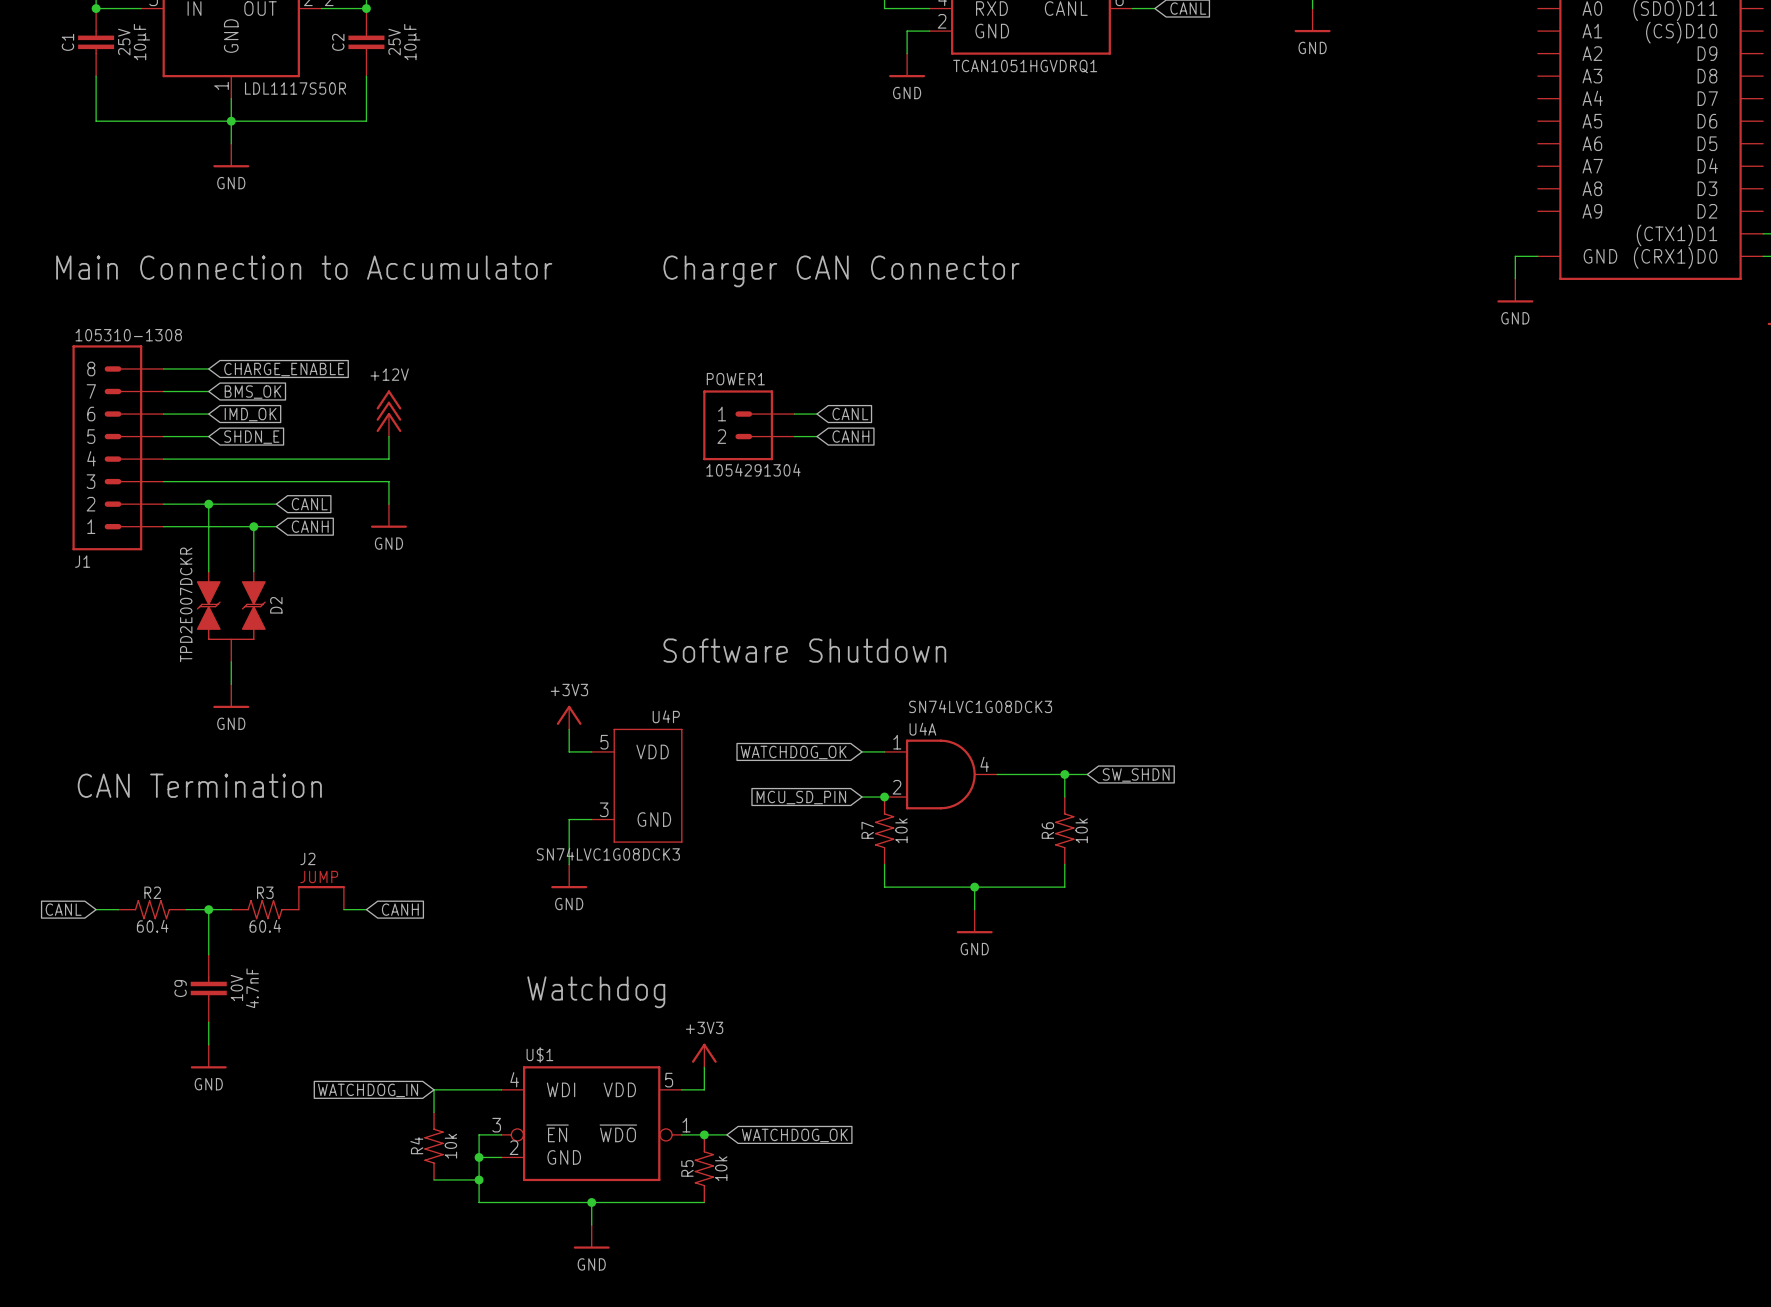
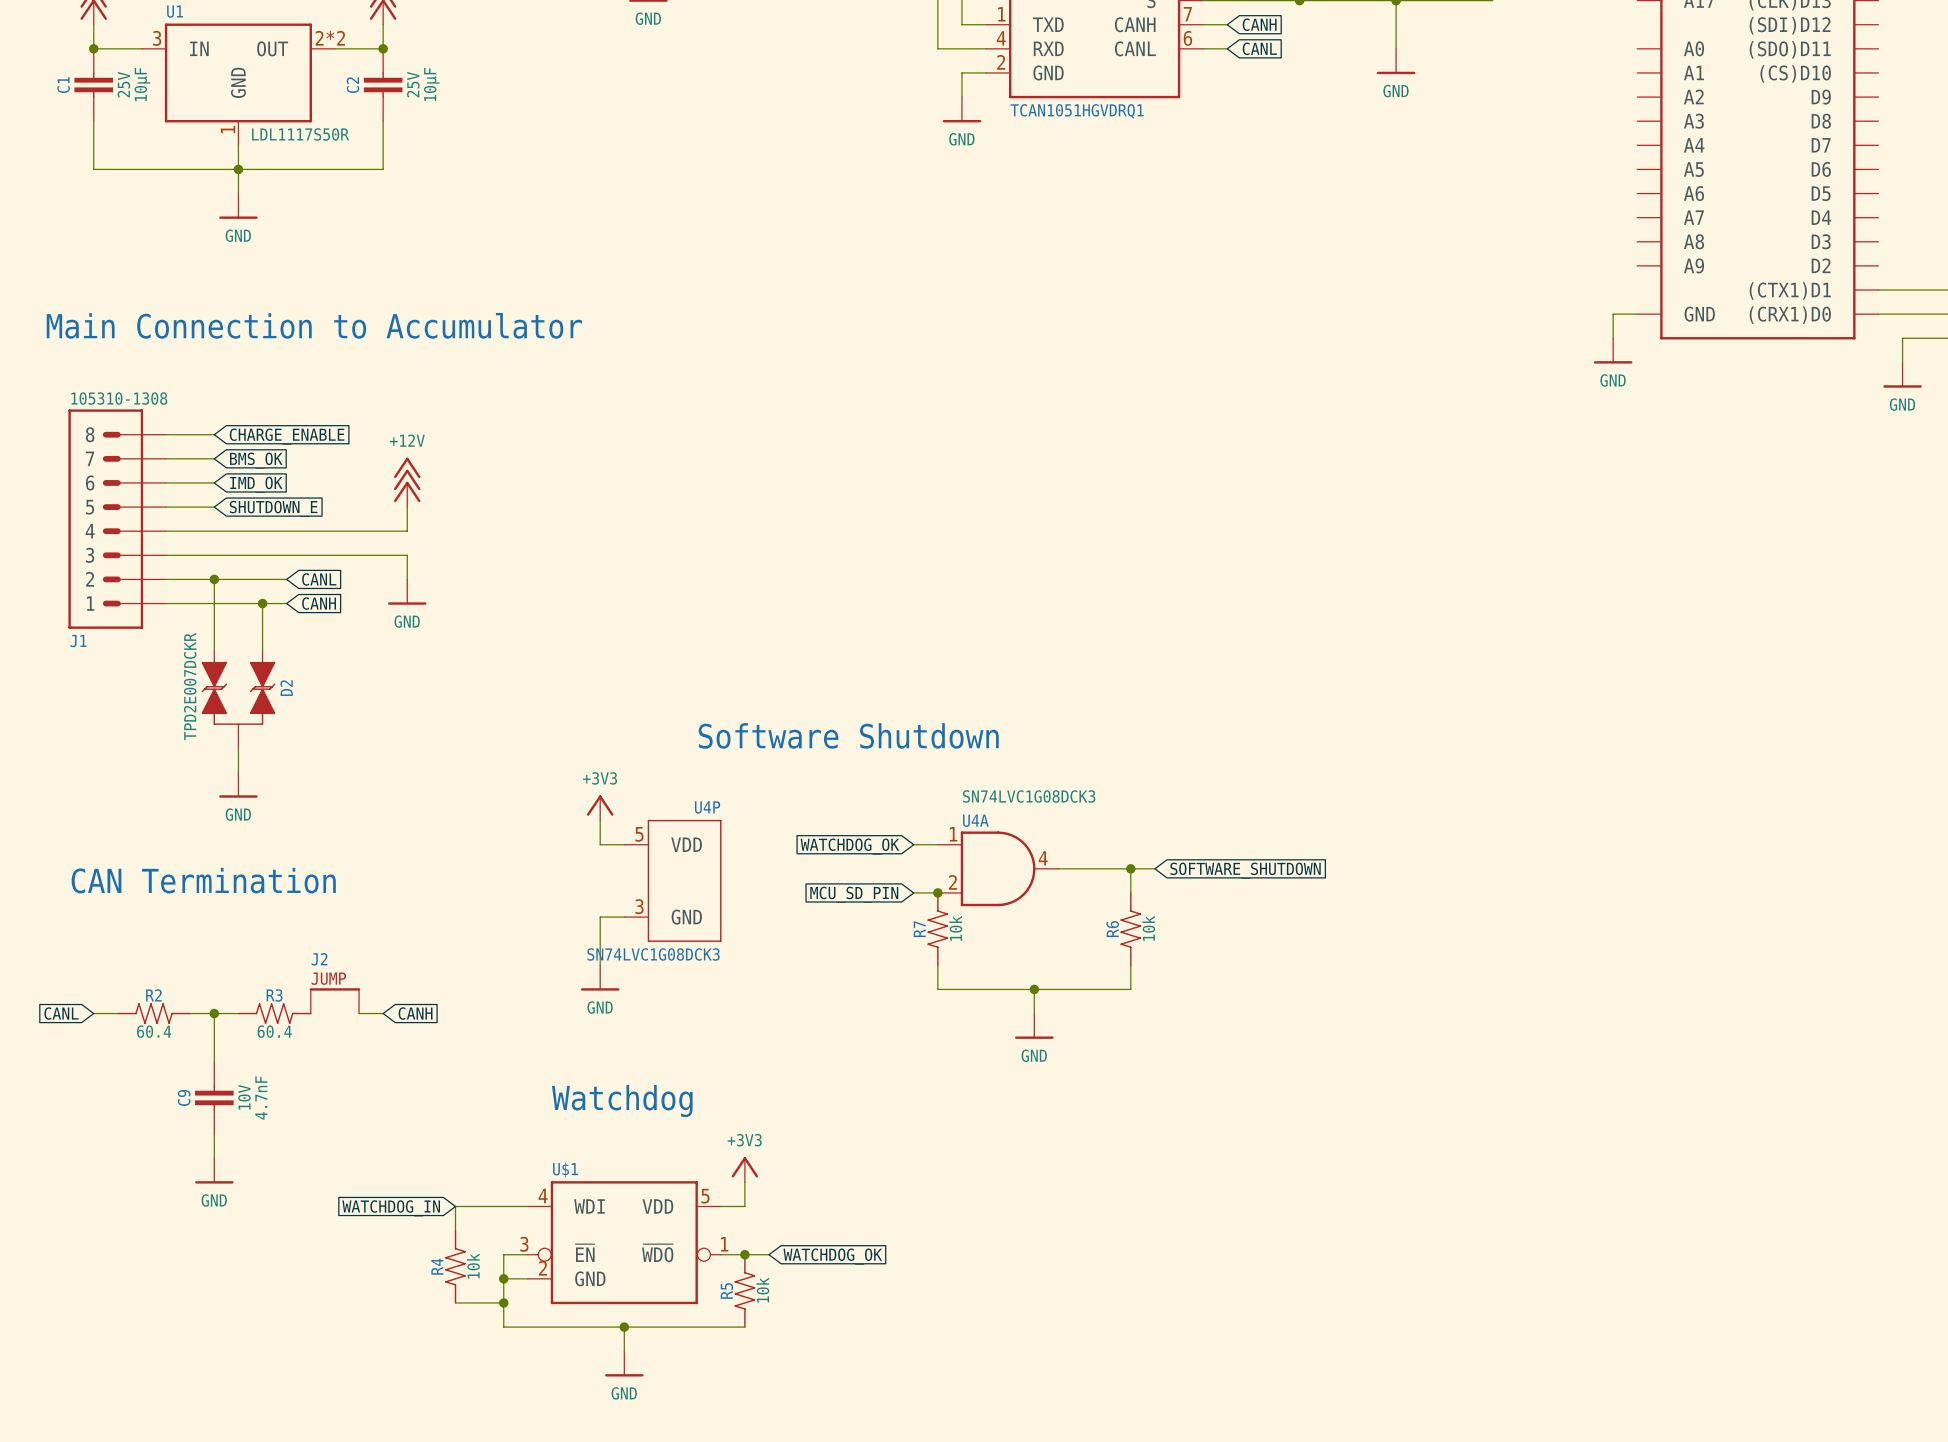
text: Charger CAN Connector (841, 271) -> none
wire: (794, 414) (816, 414) -> none
global label: CANL (850, 414) -> none
POWER1: (748, 425) -> none
wire: (794, 436) (816, 436) -> none
global label: CANH (850, 436) -> none
global label: SHDN_E (251, 437) -> SHUTDOWN_E (273, 508)
global label: SW_SHDN (1136, 775) -> SOFTWARE_SHUTDOWN (1245, 870)

